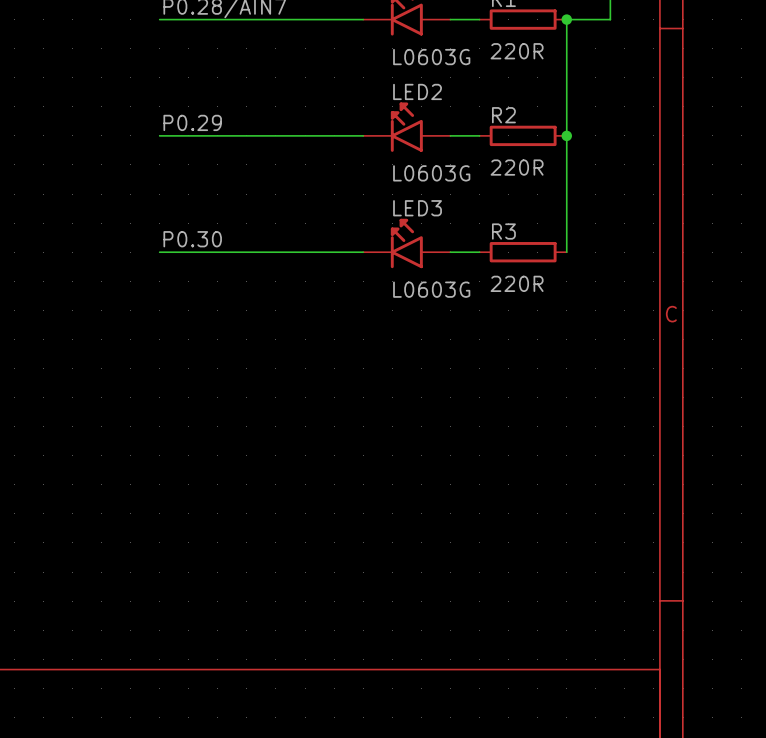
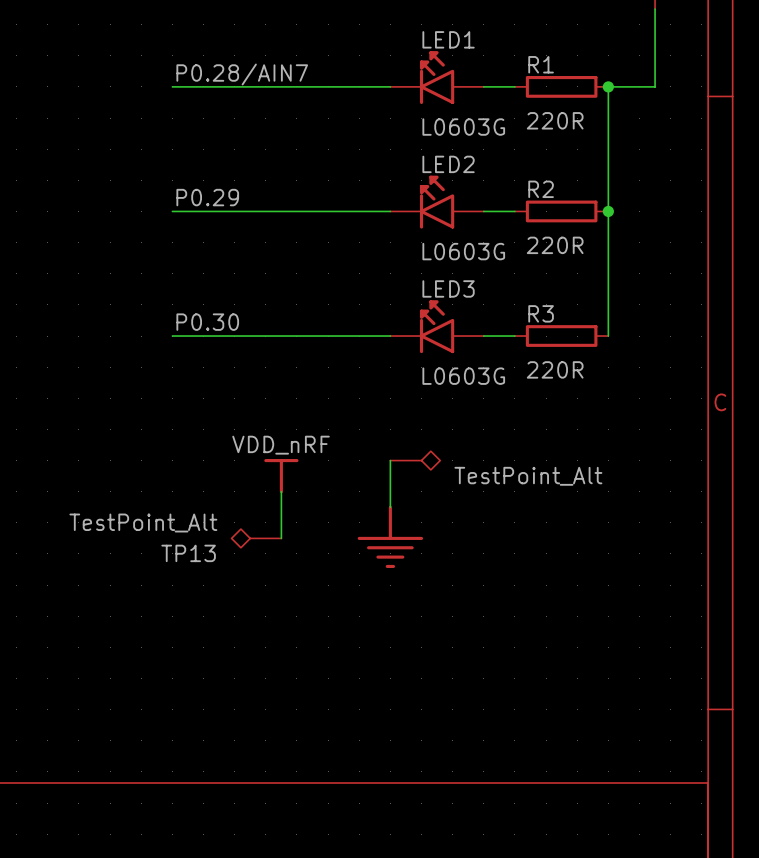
wire: none -> (390, 460) (390, 507)
part: none -> TestPoint_Alt (415, 460)
power symbol: none -> VDD_nRF (281, 476)
wire: none -> (281, 491) (281, 538)
power symbol: none -> (390, 536)
TP13: none -> TestPoint_Alt (256, 538)

